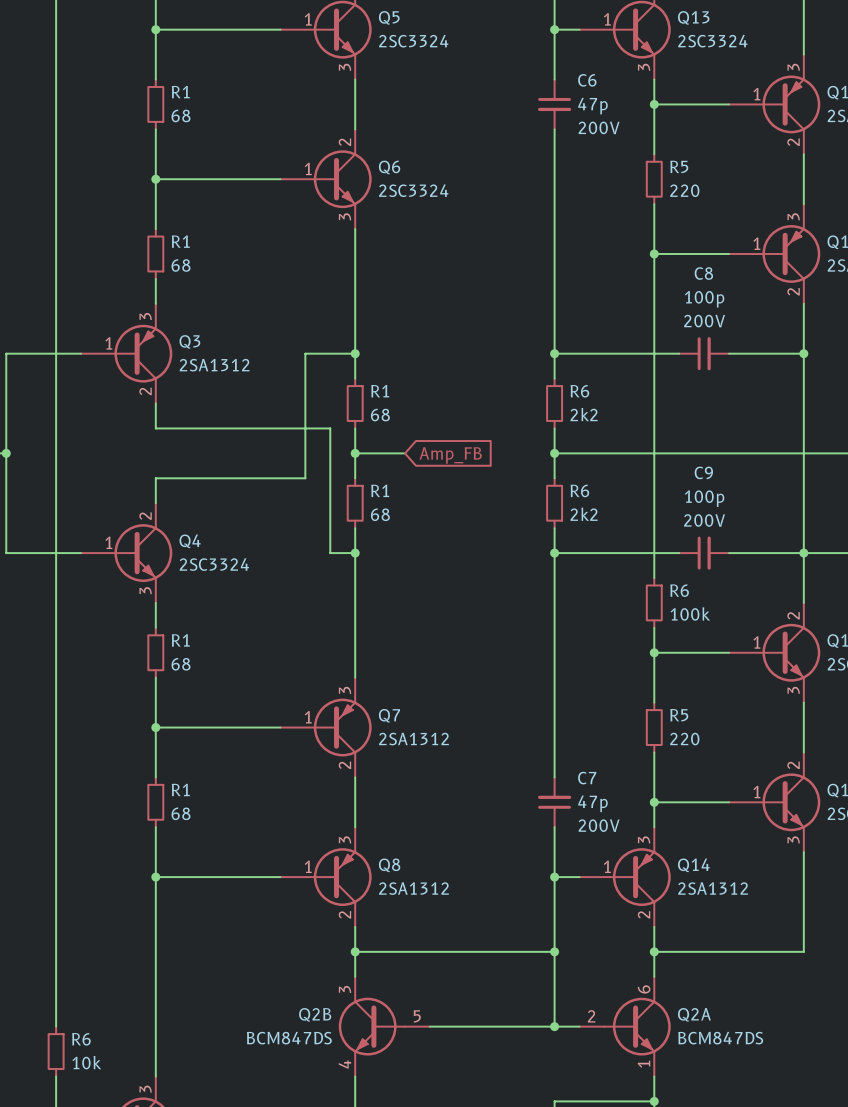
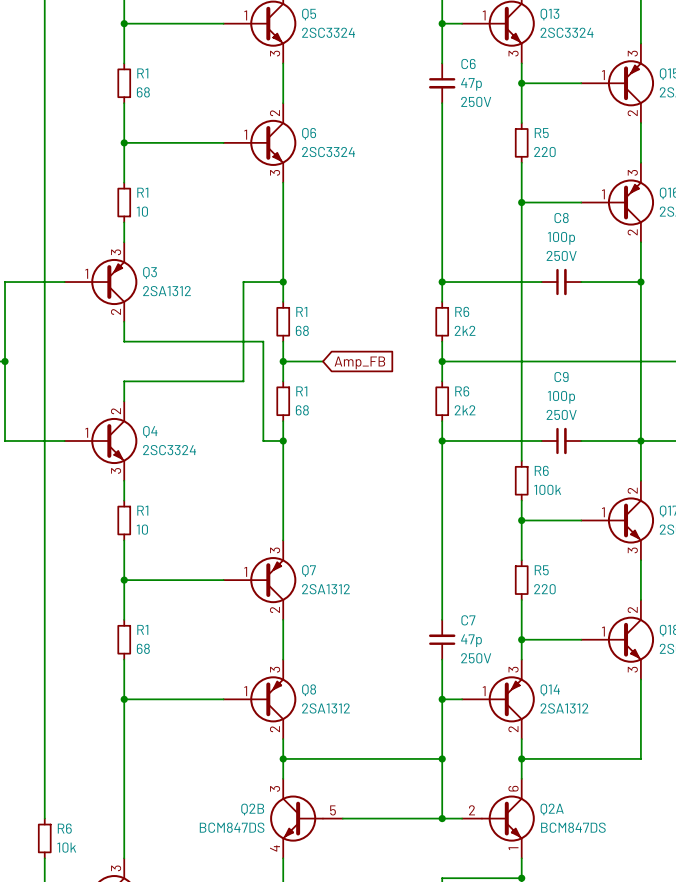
C6 text: 200V (599, 127) -> 250V (476, 101)
R1 value: 68 (180, 265) -> 10 (142, 211)
C8 text: 200V (704, 321) -> 250V (561, 255)
C9 text: 200V (704, 520) -> 250V (561, 414)
R1 value: 68 (180, 664) -> 10 (142, 529)
C7 text: 200V (599, 825) -> 250V (476, 658)

